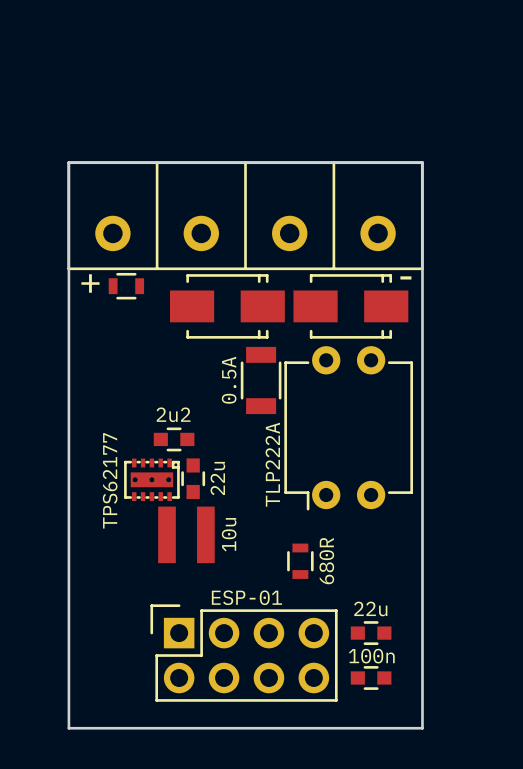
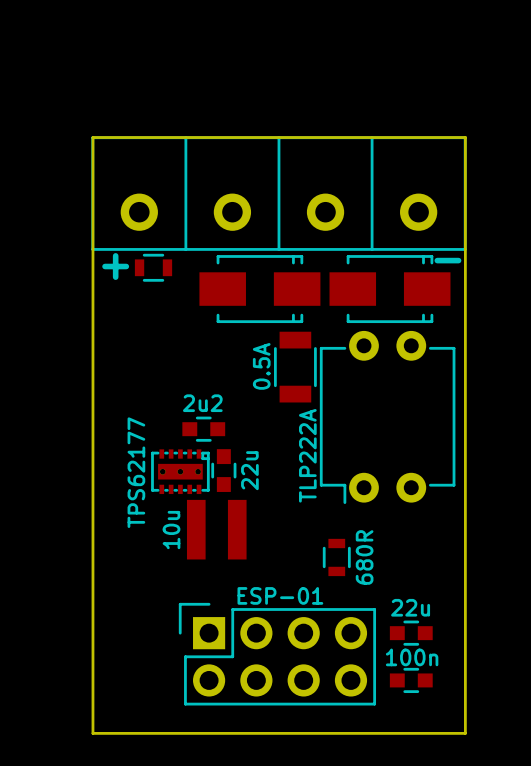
part value position: 10u (229, 534) -> 10u (171, 530)

